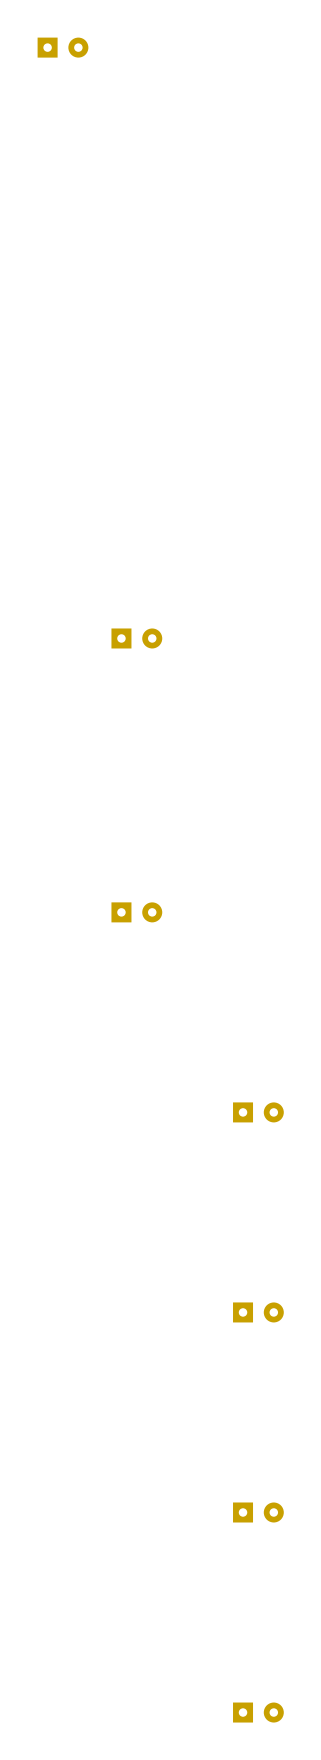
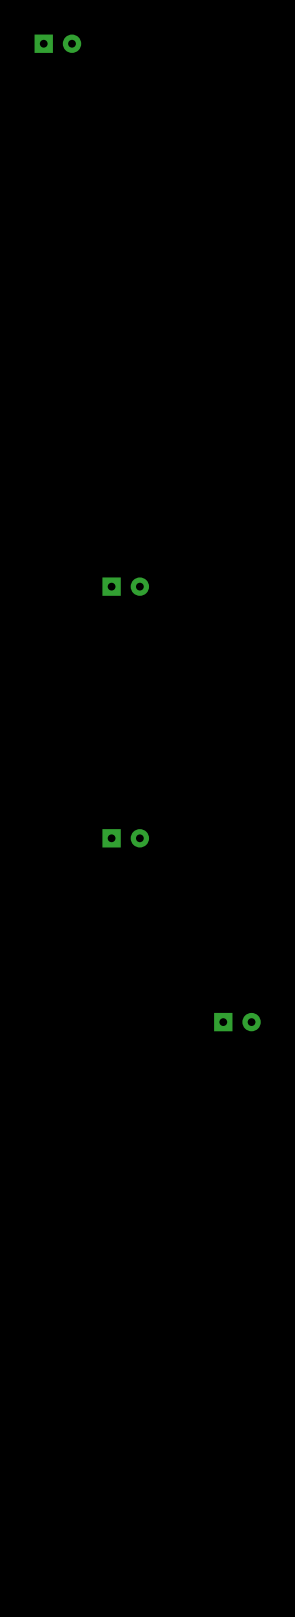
part: (258, 1312) -> none
part: (258, 1512) -> none
part: (258, 1712) -> none

